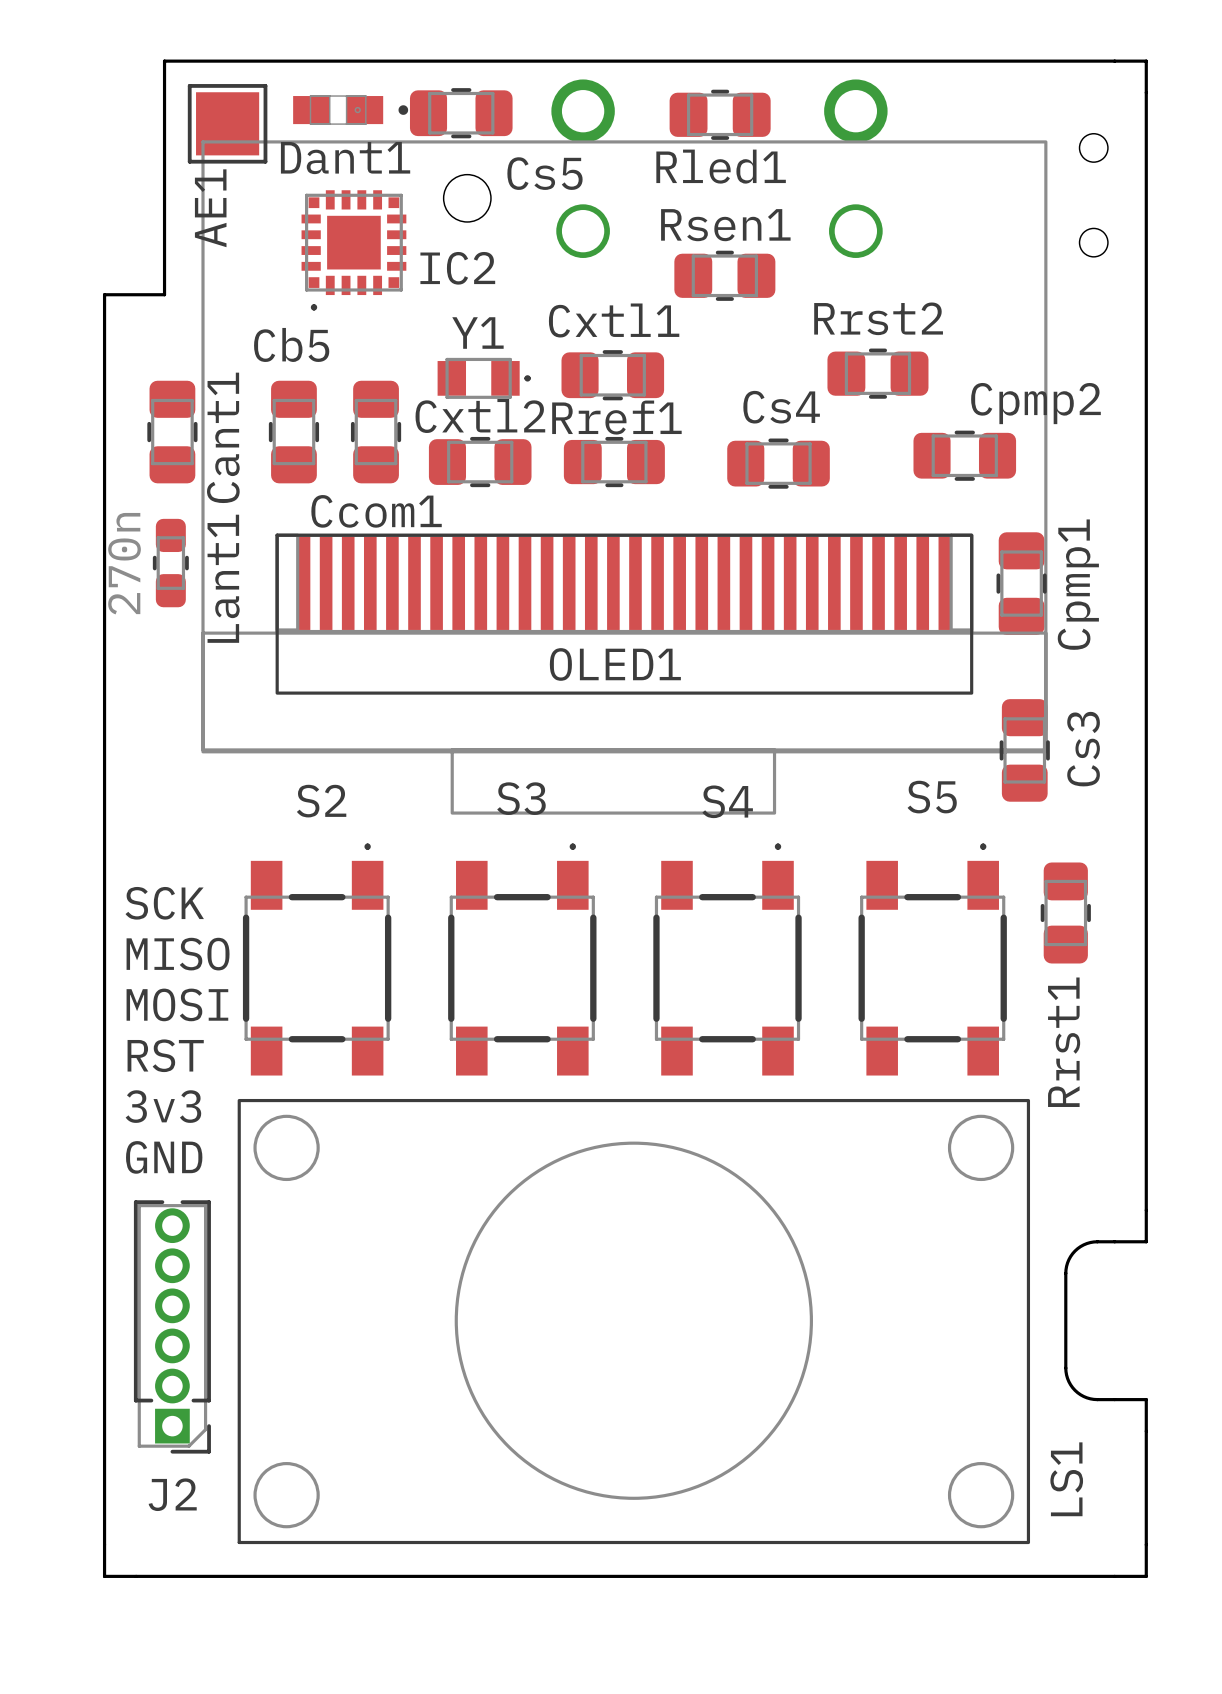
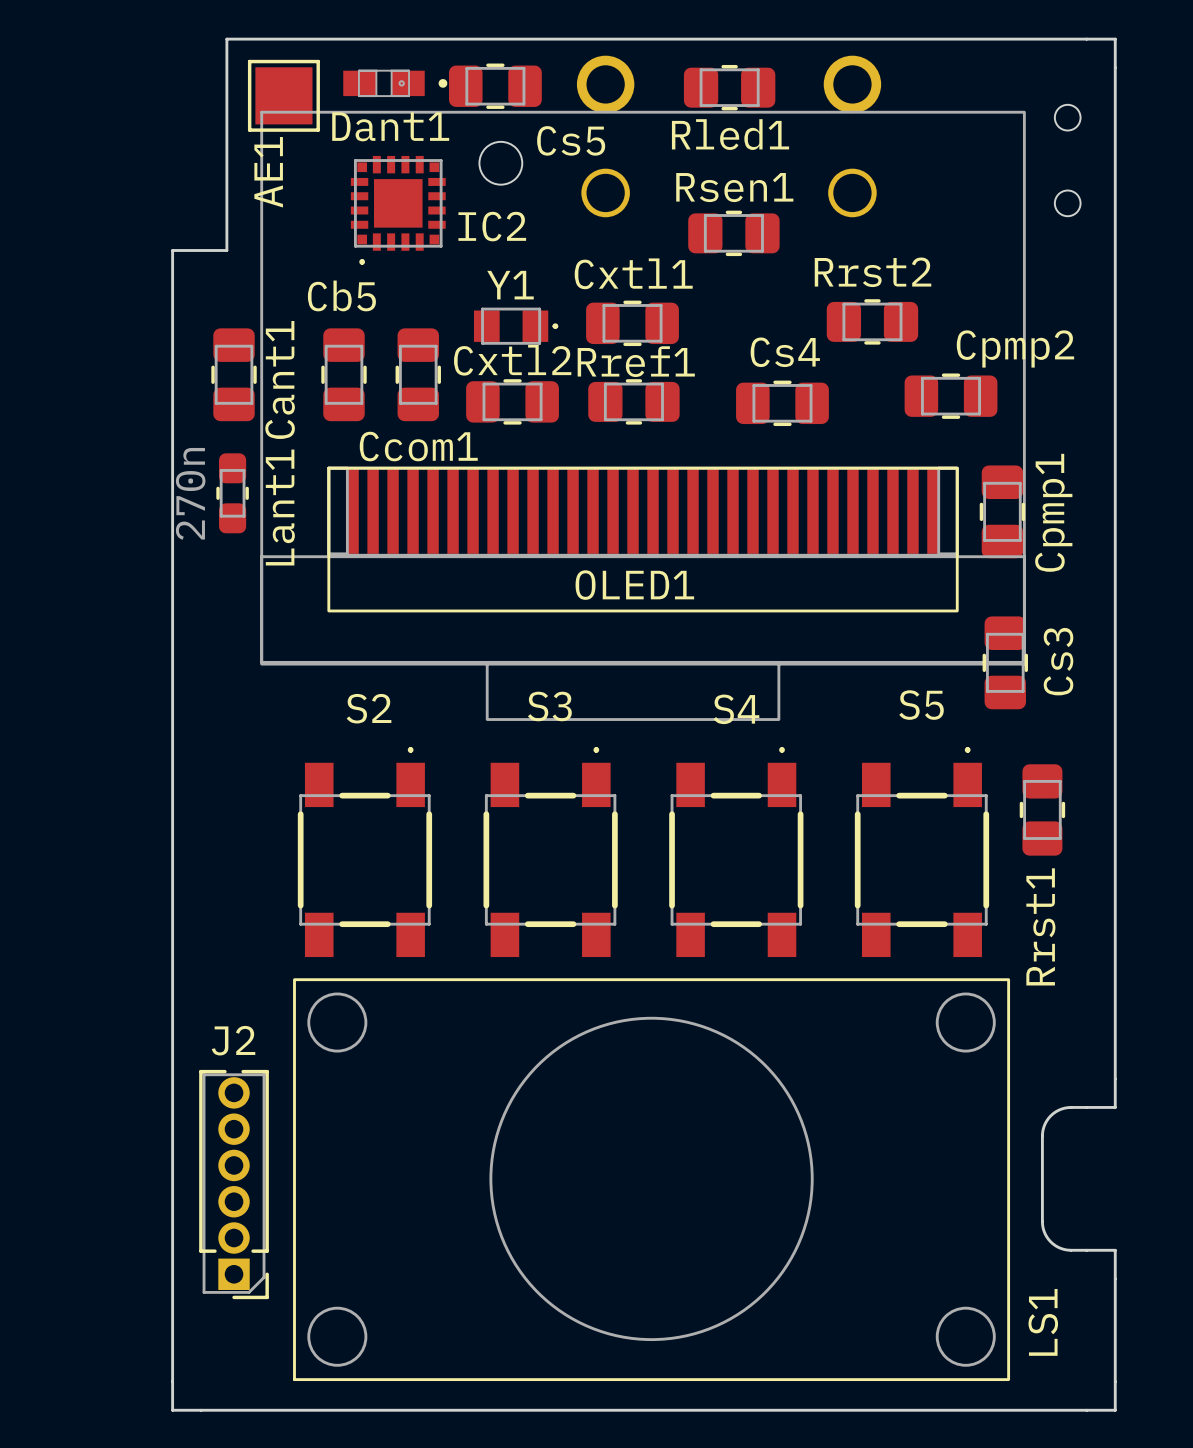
text: SCK (164, 903) -> none
text: MISO (178, 954) -> none
text: MOSI (177, 1004) -> none
text: RST (165, 1055) -> none
text: 3v3 (163, 1106) -> none
text: GND (164, 1157) -> none
J2 name position: J2 (172, 1494) -> J2 (233, 1040)

